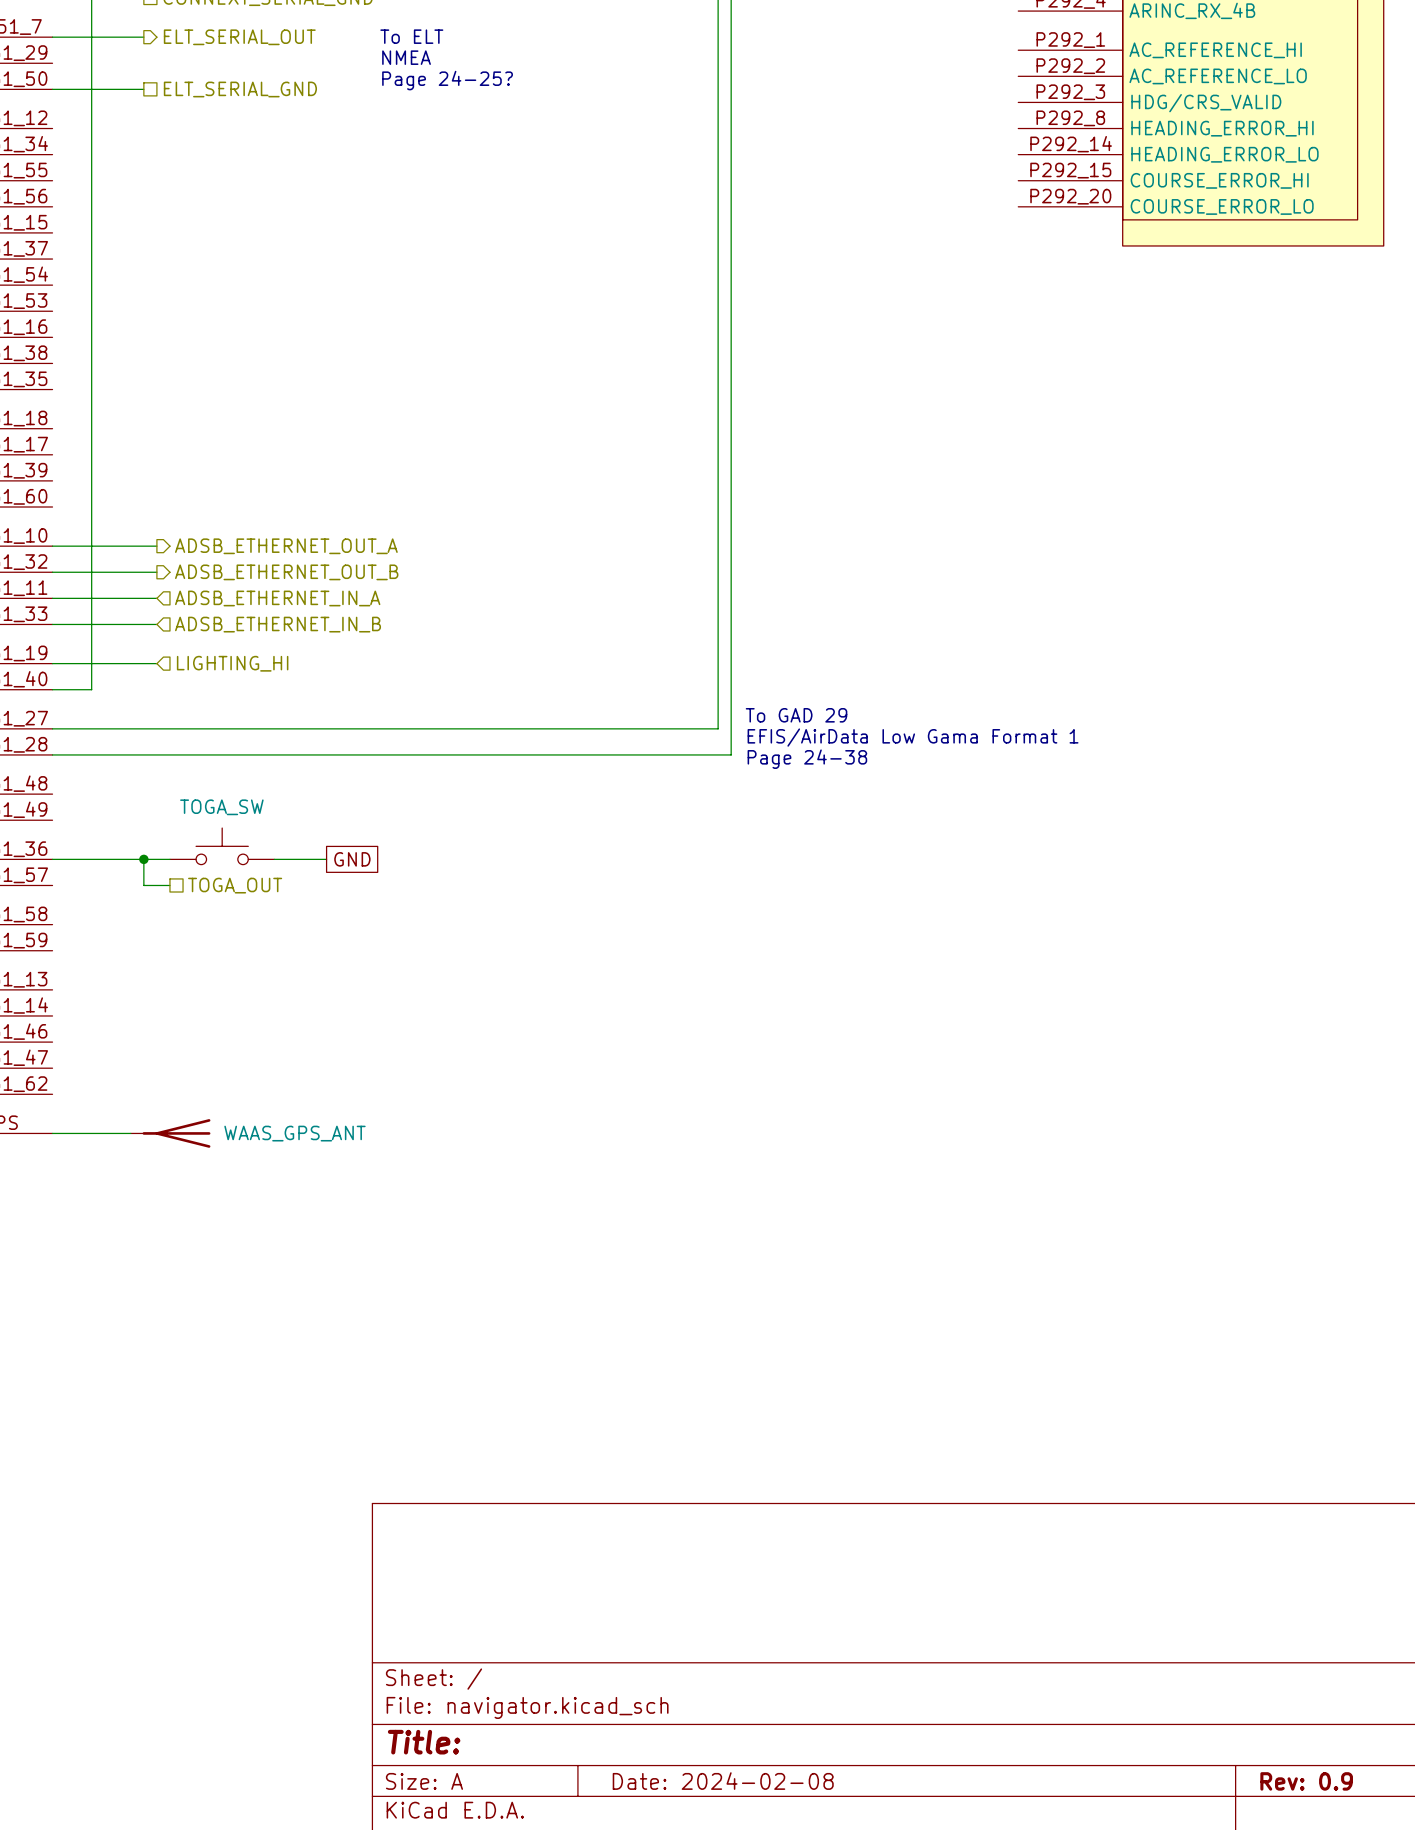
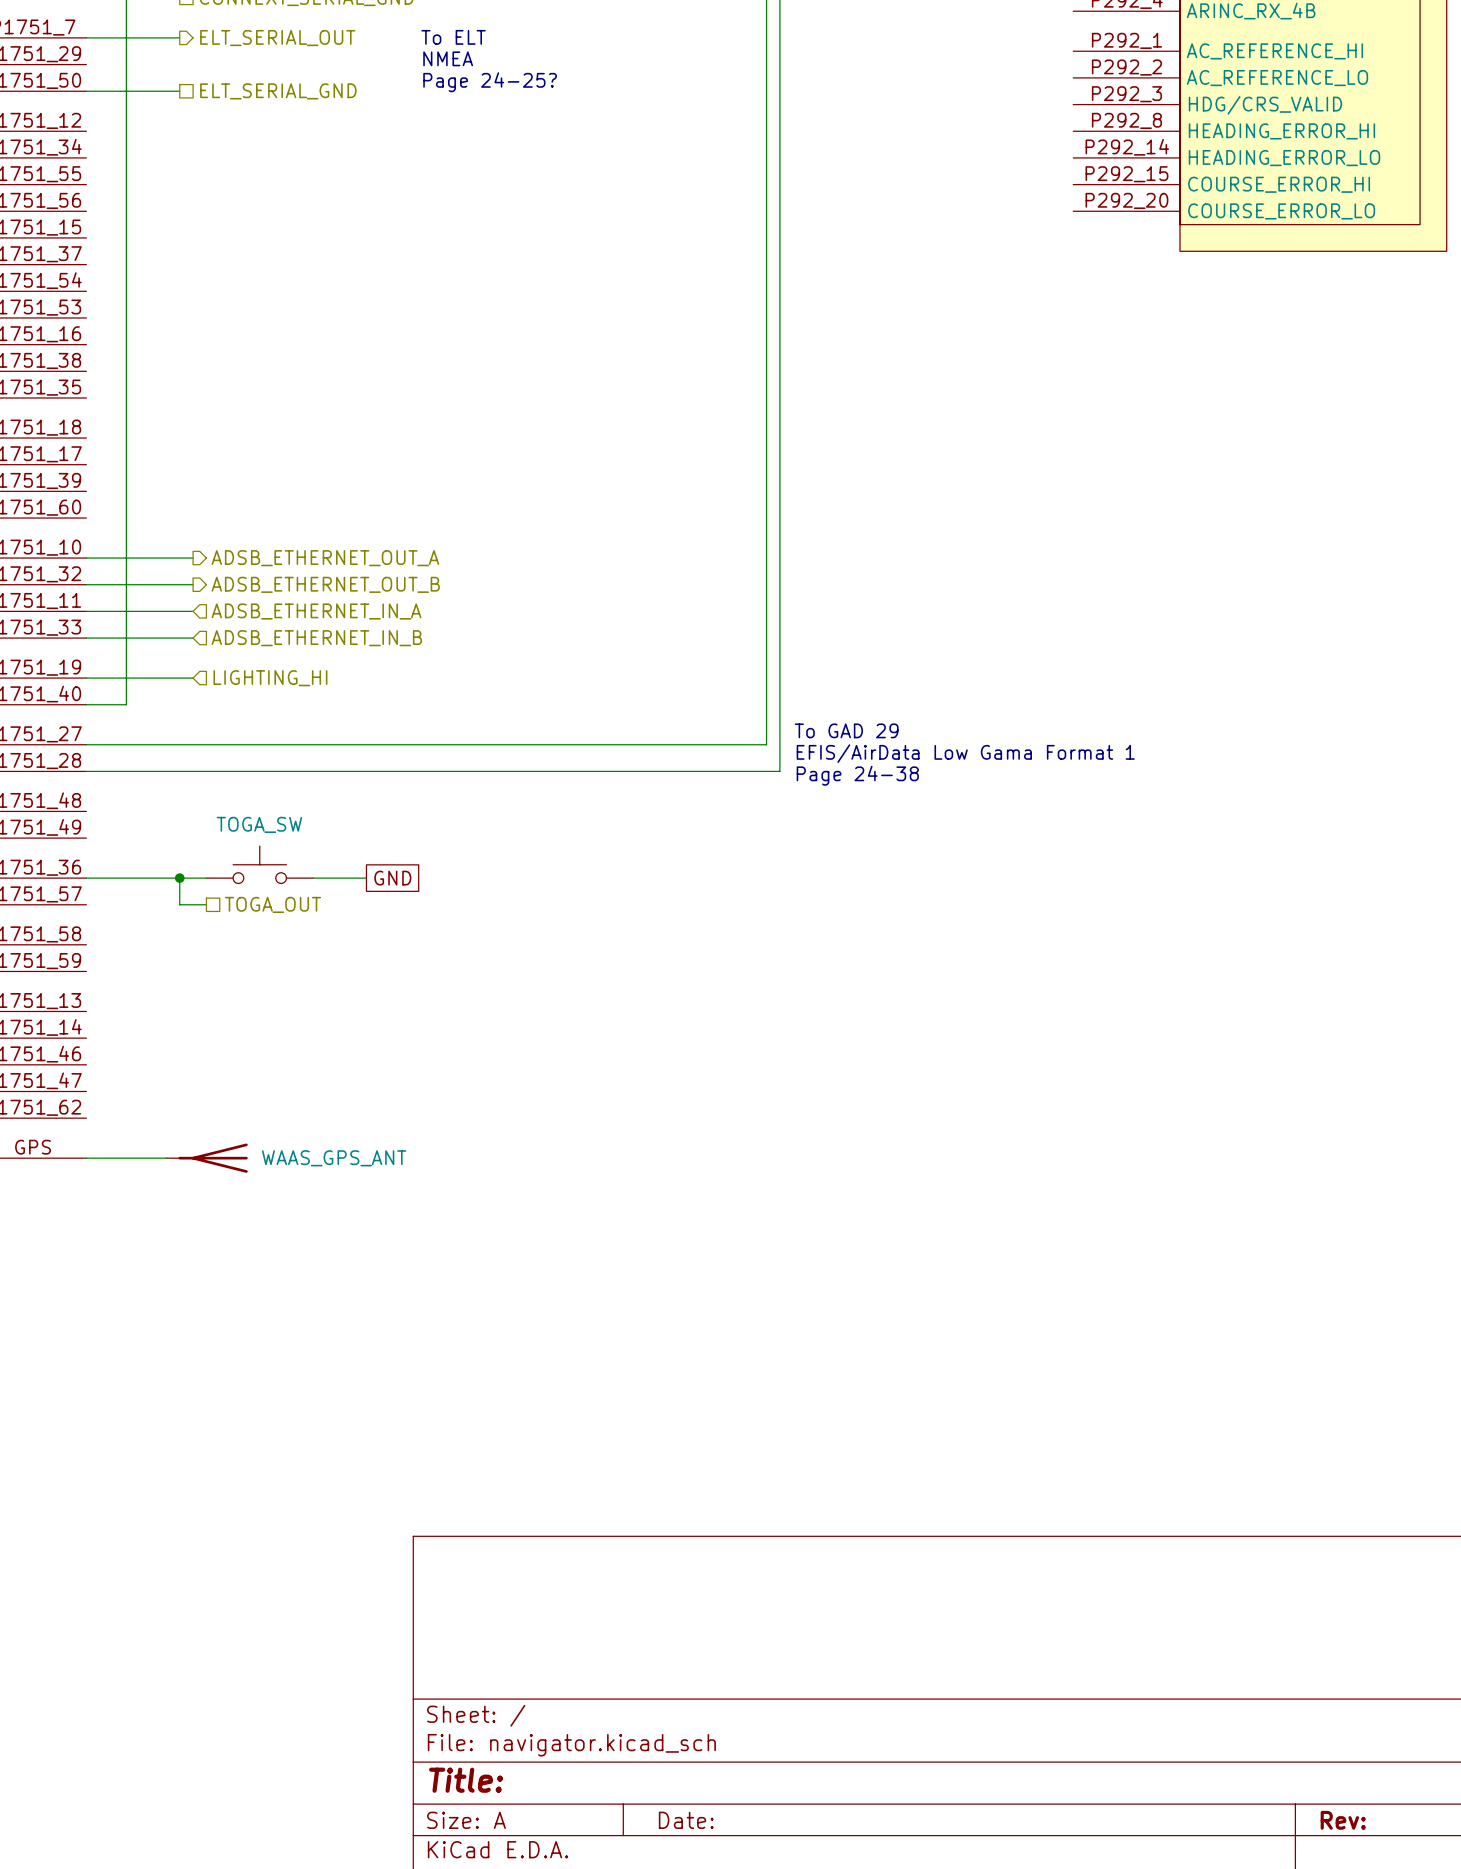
title block: Date: 2024-02-08 (723, 1781) -> Date: (686, 1820)
title block: Rev: 0.9 (1306, 1781) -> Rev: (1343, 1820)

